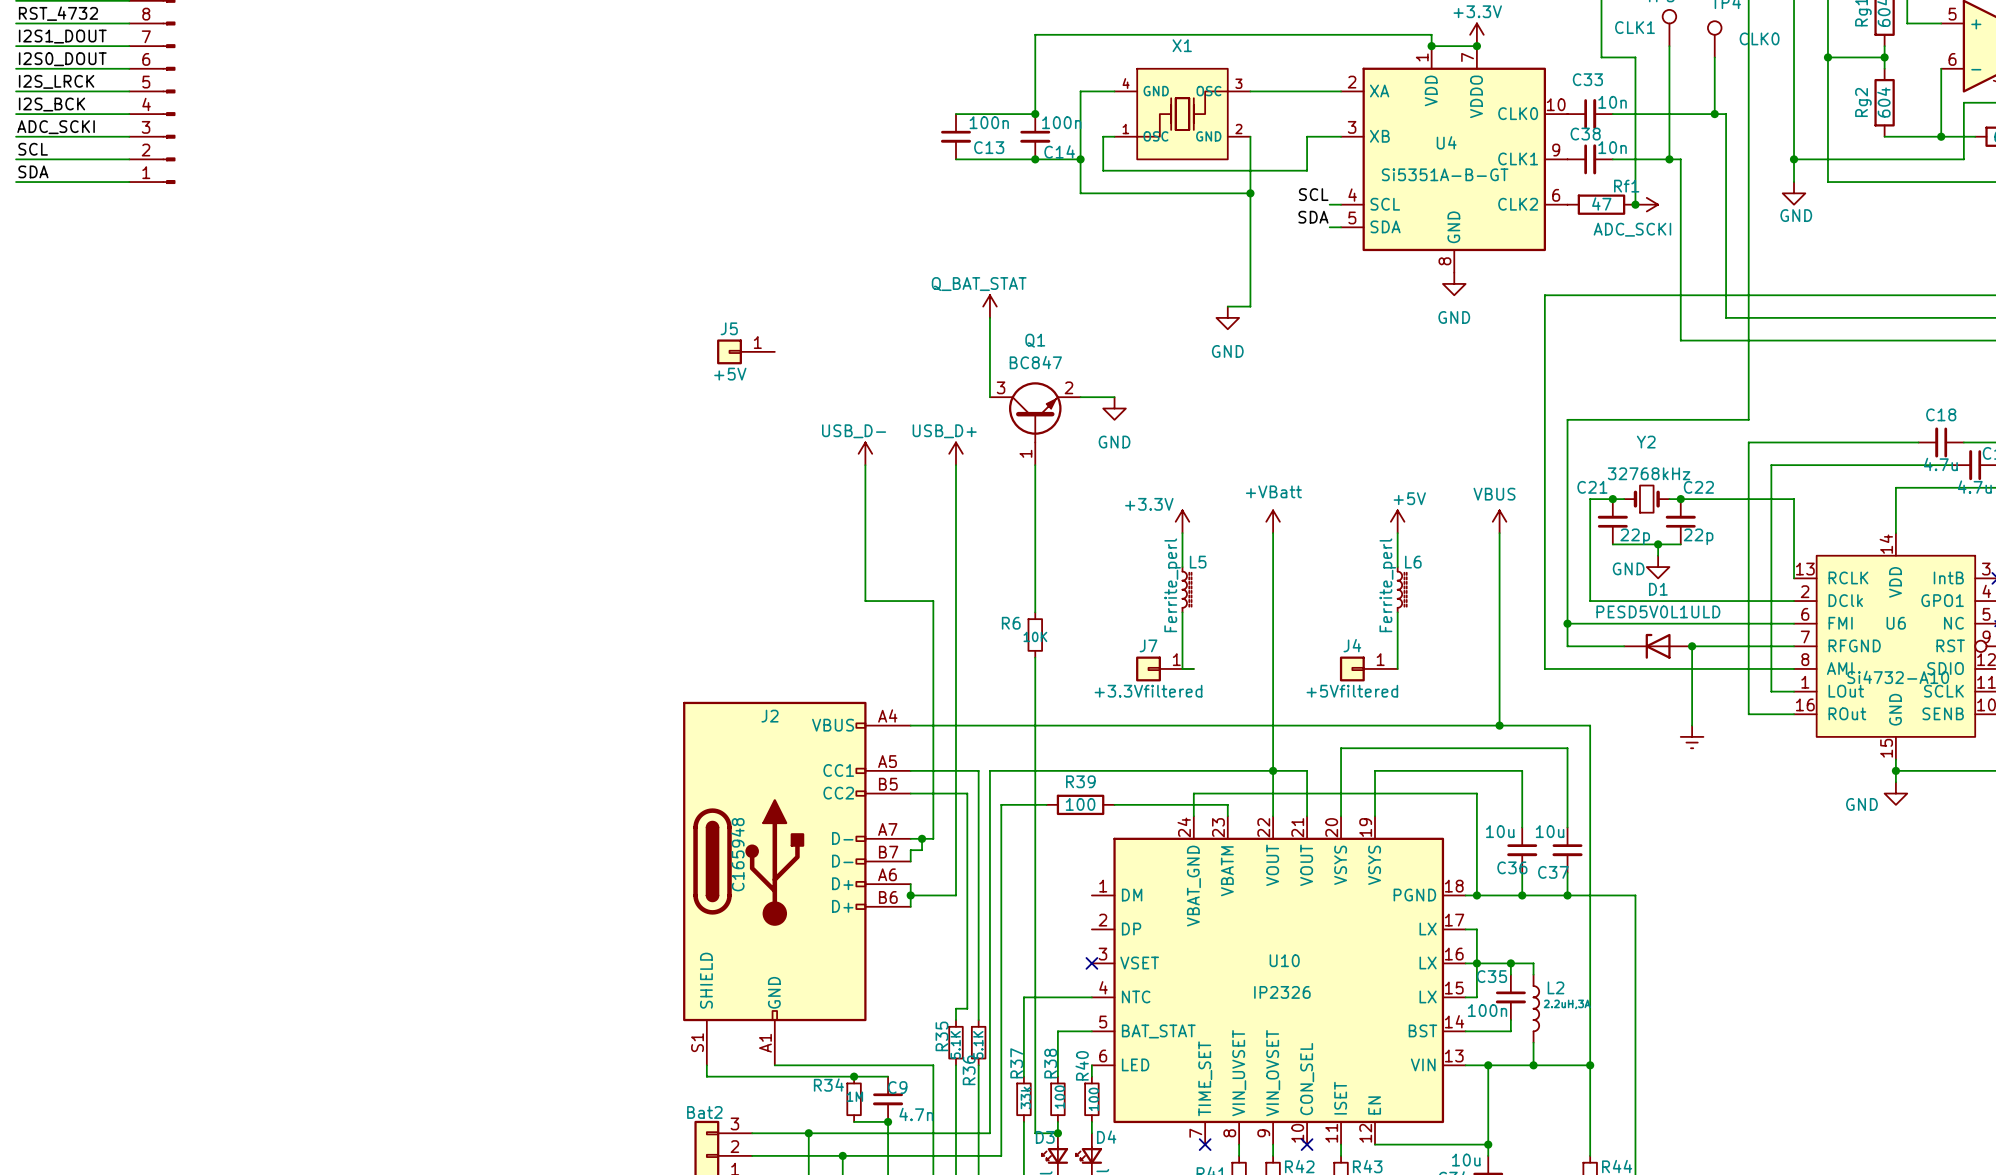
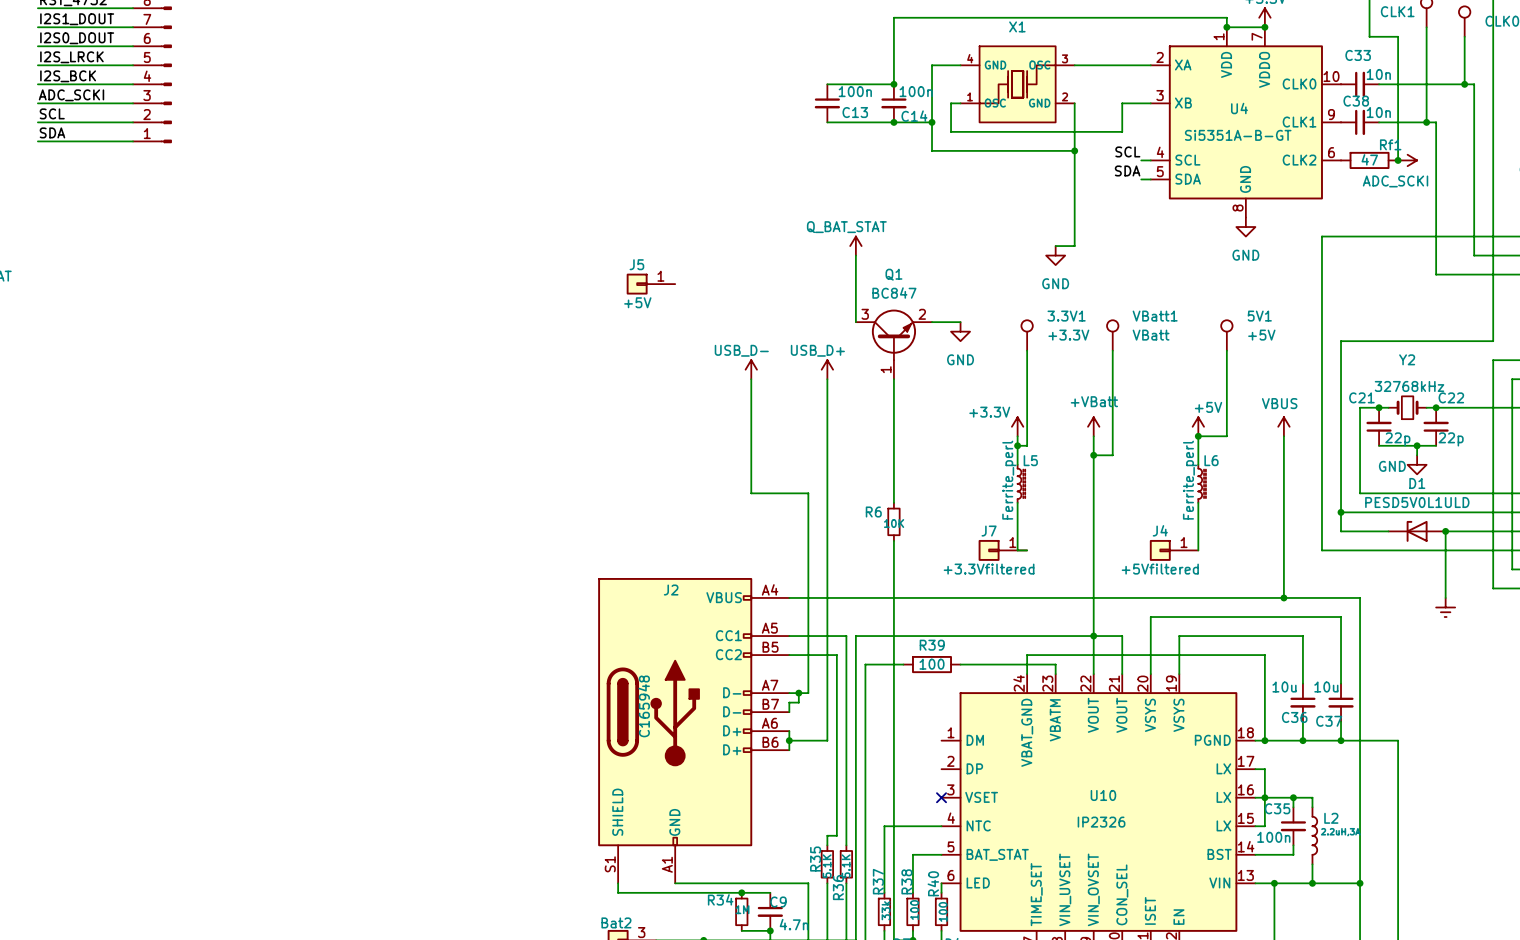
3.3V1: none -> +3.3V (1027, 335)
VBatt1: none -> VBatt (1112, 335)
5V1: none -> +5V (1226, 335)
wire: none -> (1027, 350) (1027, 445) (1017, 445)
wire: none -> (1112, 350) (1112, 455) (1093, 455)
wire: none -> (1226, 350) (1226, 436) (1198, 436)
junction: none -> (1198, 436)
junction: none -> (1017, 445)
junction: none -> (1093, 455)

